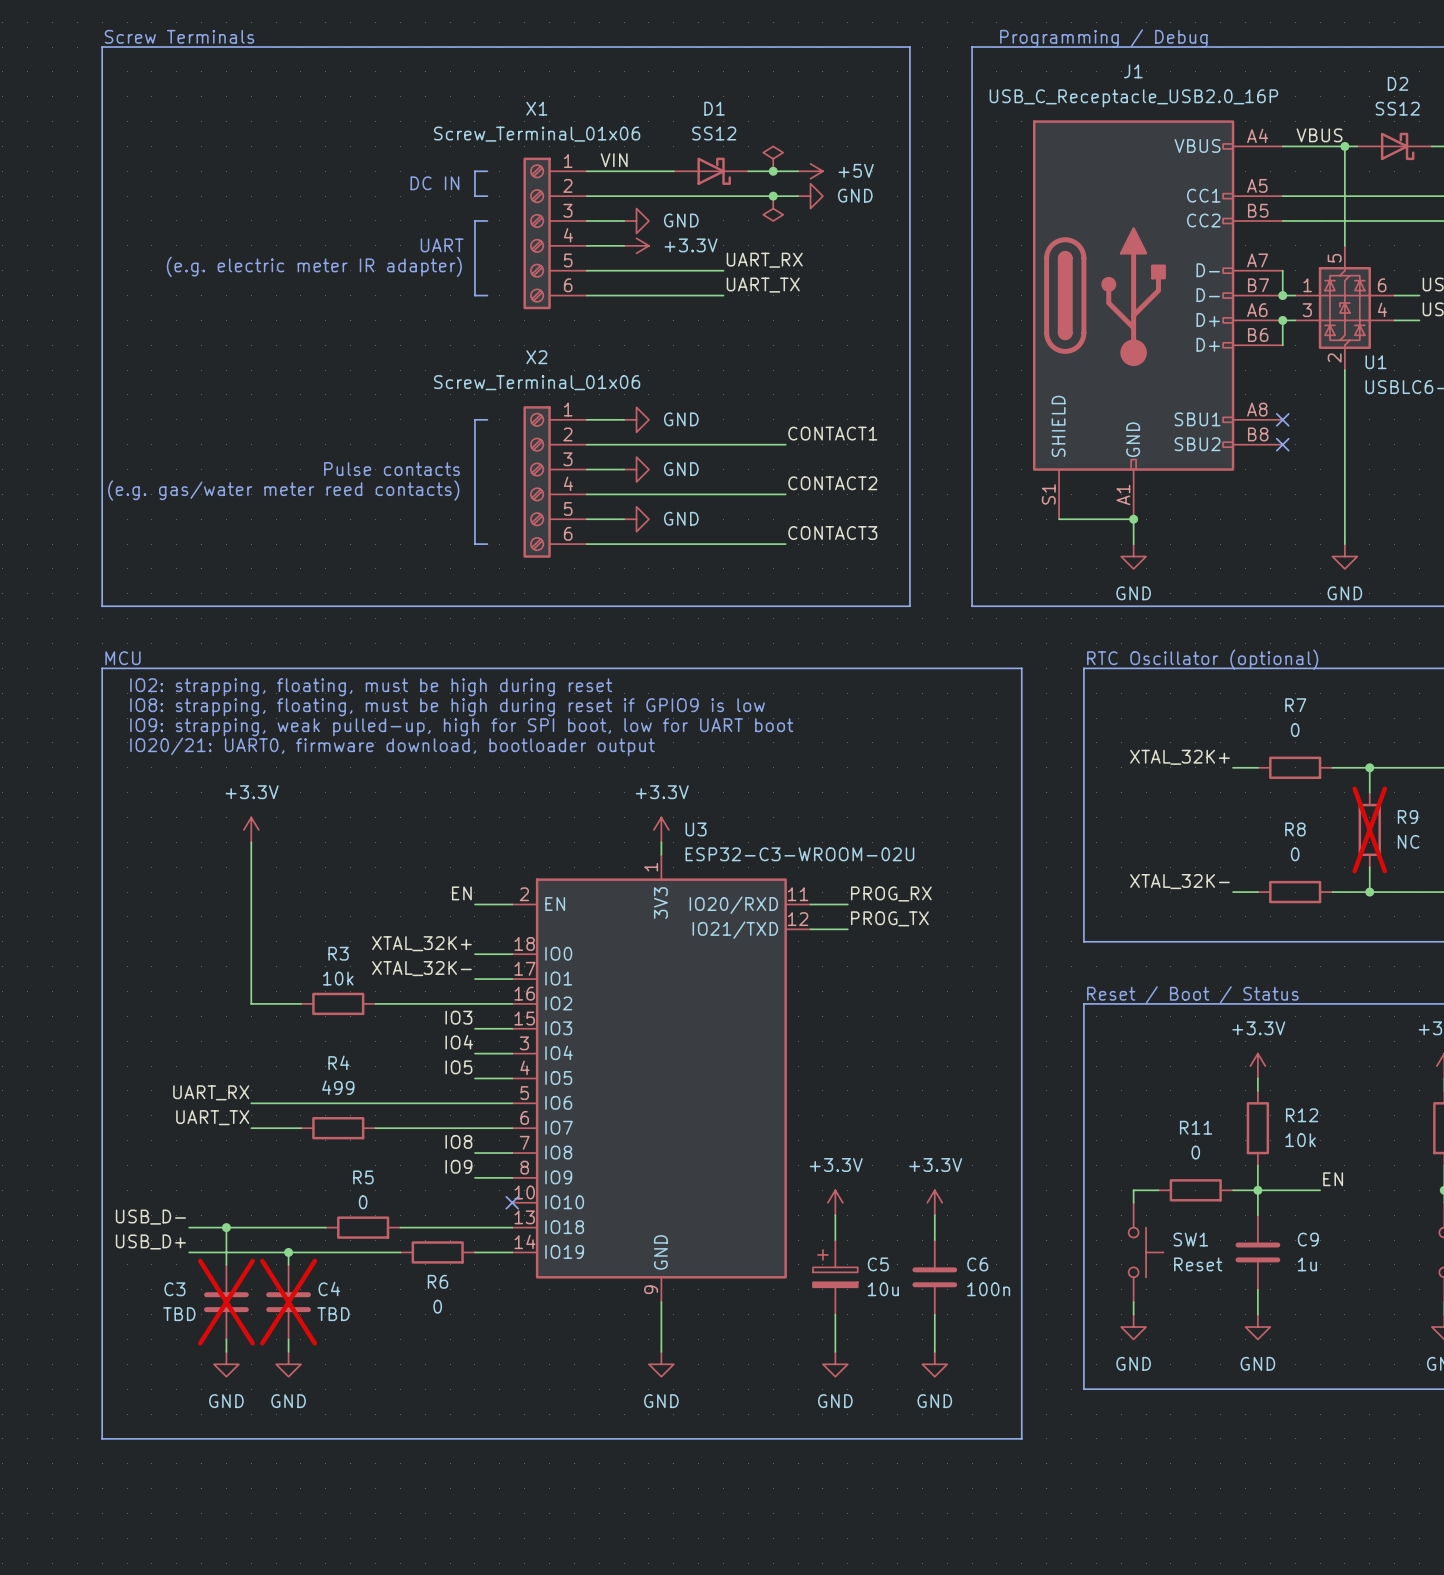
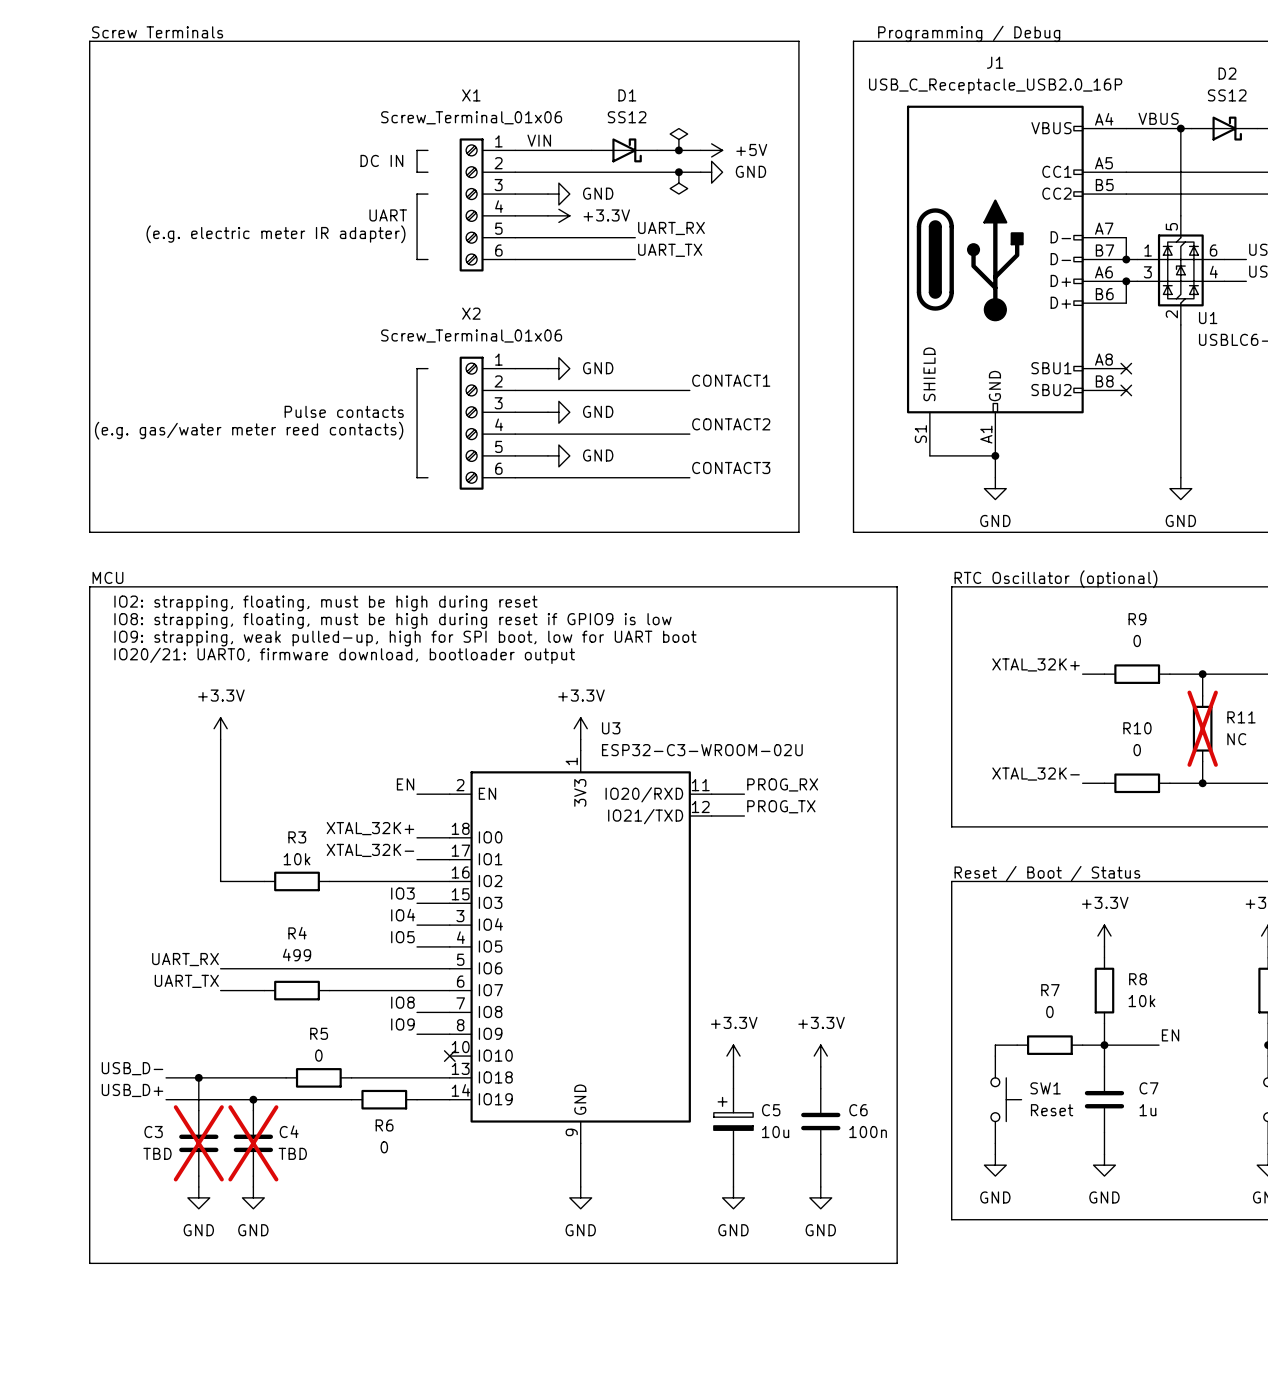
R7 name: R7 (1295, 705) -> R9 (1137, 619)
R9 name: R9 (1408, 817) -> R11 (1241, 717)
R8 name: R8 (1295, 829) -> R10 (1137, 728)
R12 name: R12 (1302, 1115) -> R8 (1138, 979)
R11 name: R11 (1196, 1127) -> R7 (1050, 990)
C9 name: C9 (1308, 1239) -> C7 (1148, 1088)

